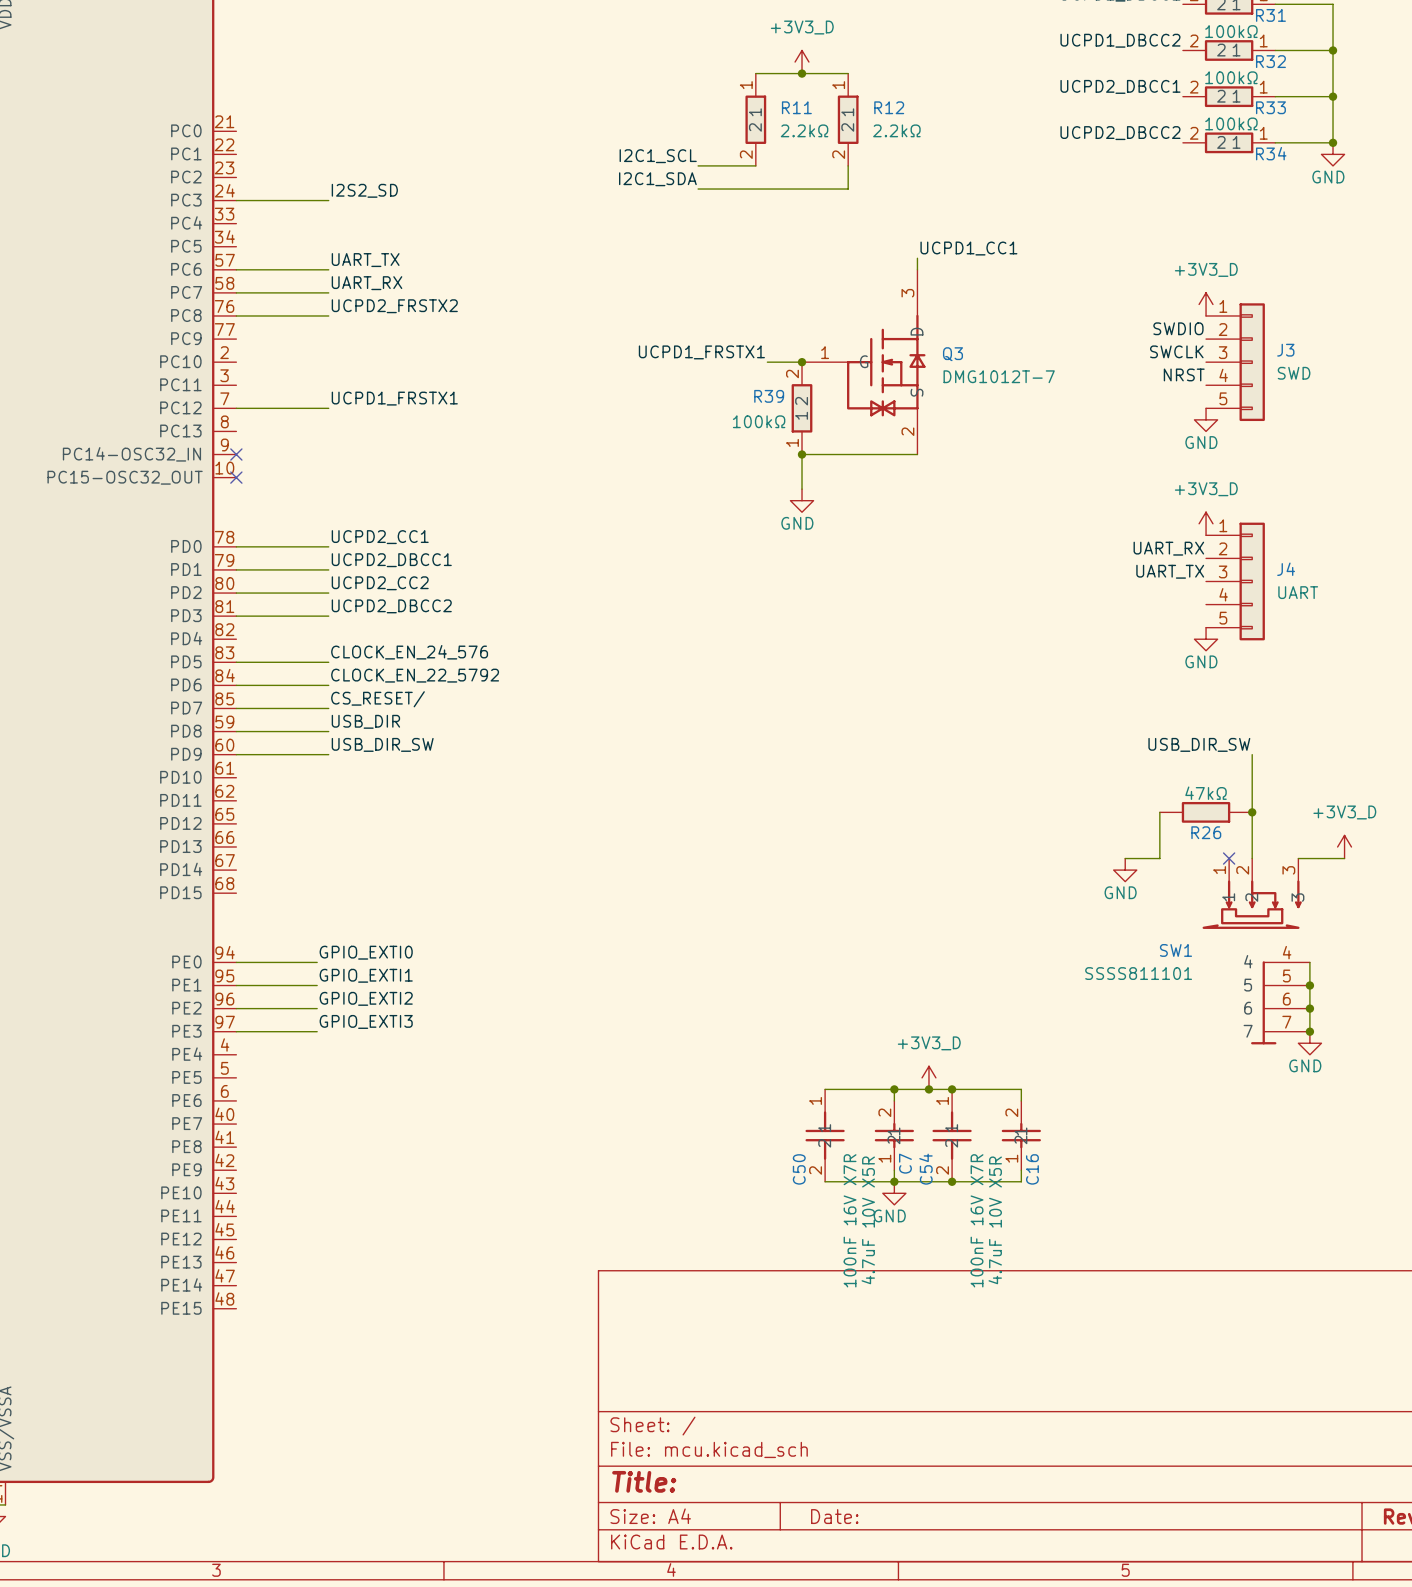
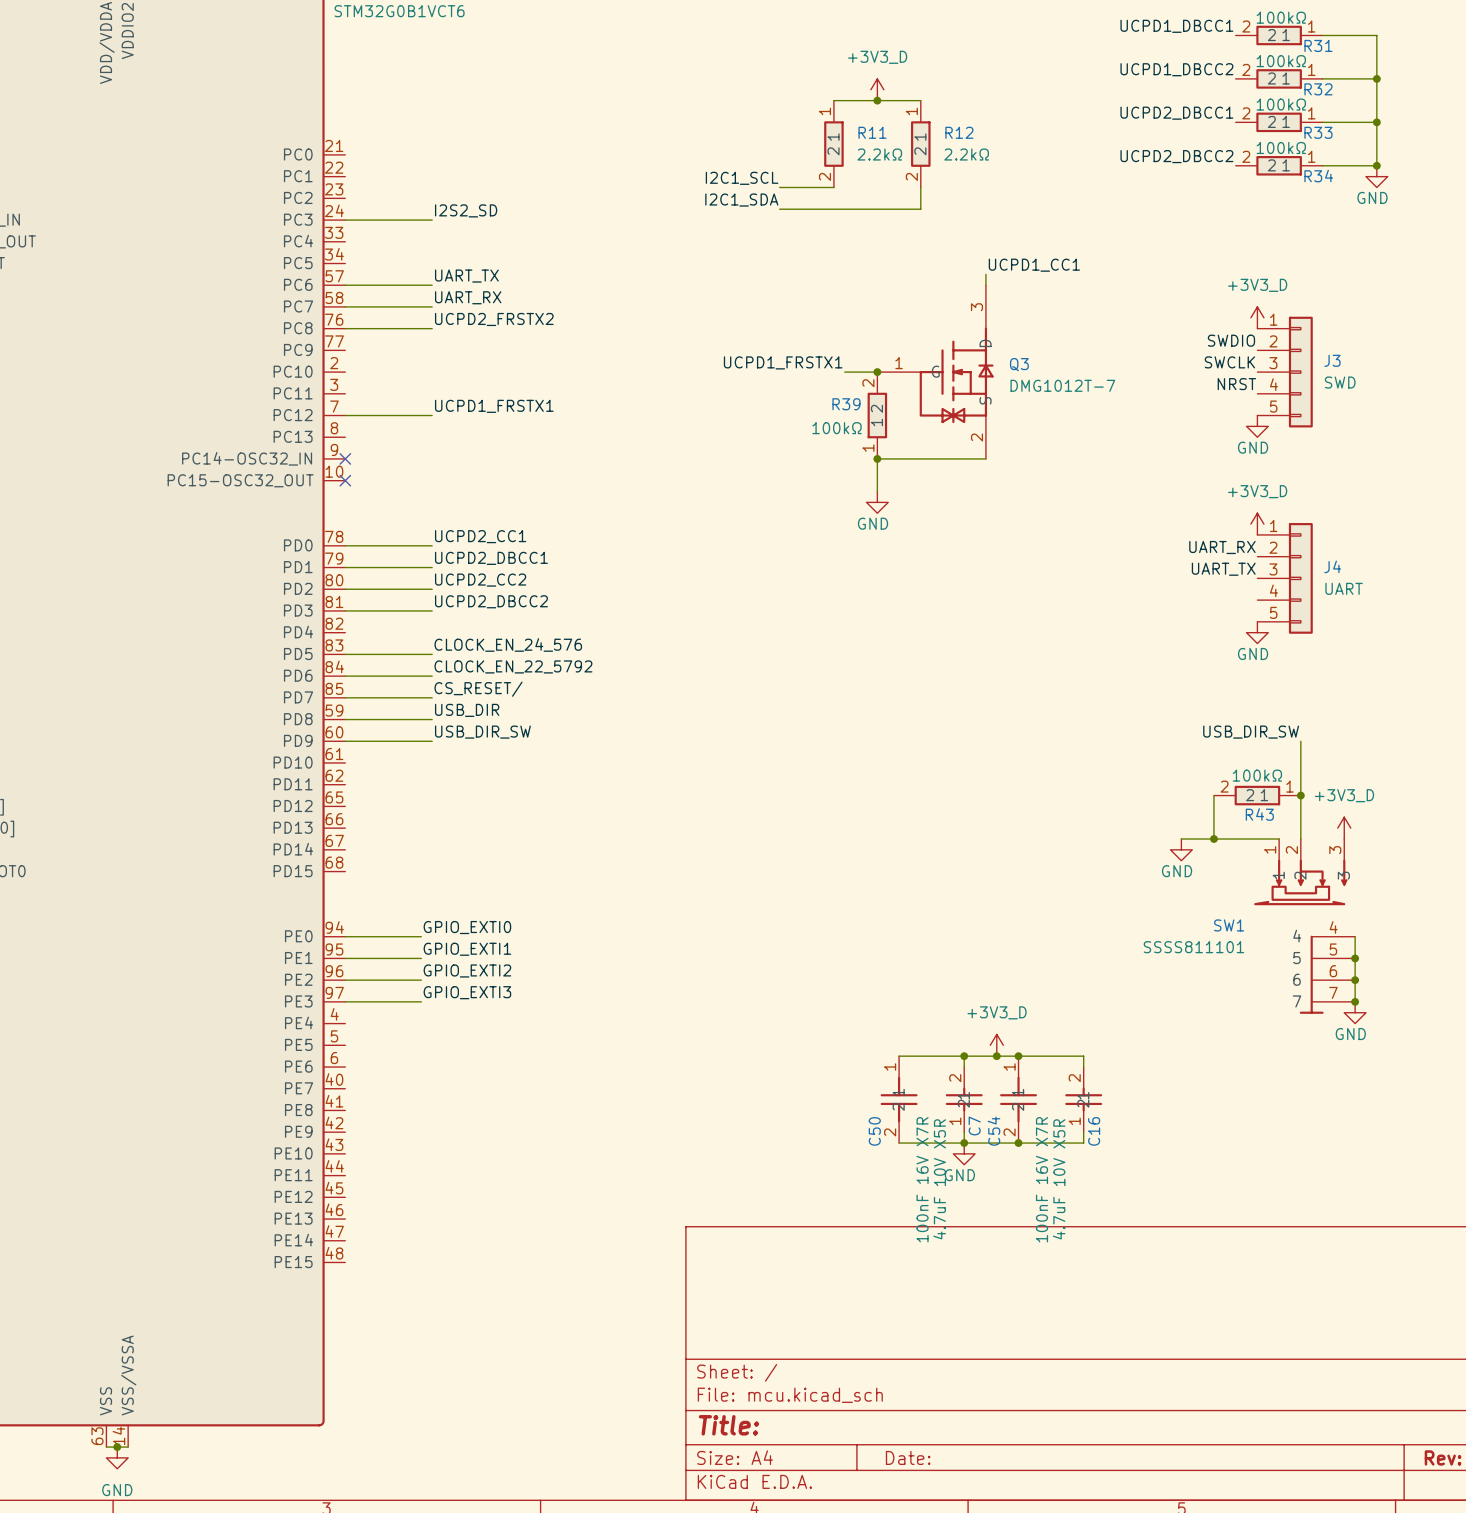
R26 value: 47kΩ (1206, 793) -> 100kΩ (1257, 775)
R26 pin number: none -> 2 (1224, 786)
R26 pin number: none -> 1 (1289, 786)
R26 pin name: none -> 2 (1250, 795)
R26 pin name: none -> 1 (1264, 795)
R26 name: R26 (1206, 832) -> R43 (1259, 814)
power symbol position: +3V3_D (1344, 846) -> +3V3_D (1344, 828)
wire: none -> (1213, 838) (1279, 838)
junction: none -> (1213, 838)
no-connect mark: (1229, 858) -> none
wire: (1298, 858) (1344, 858) -> none

